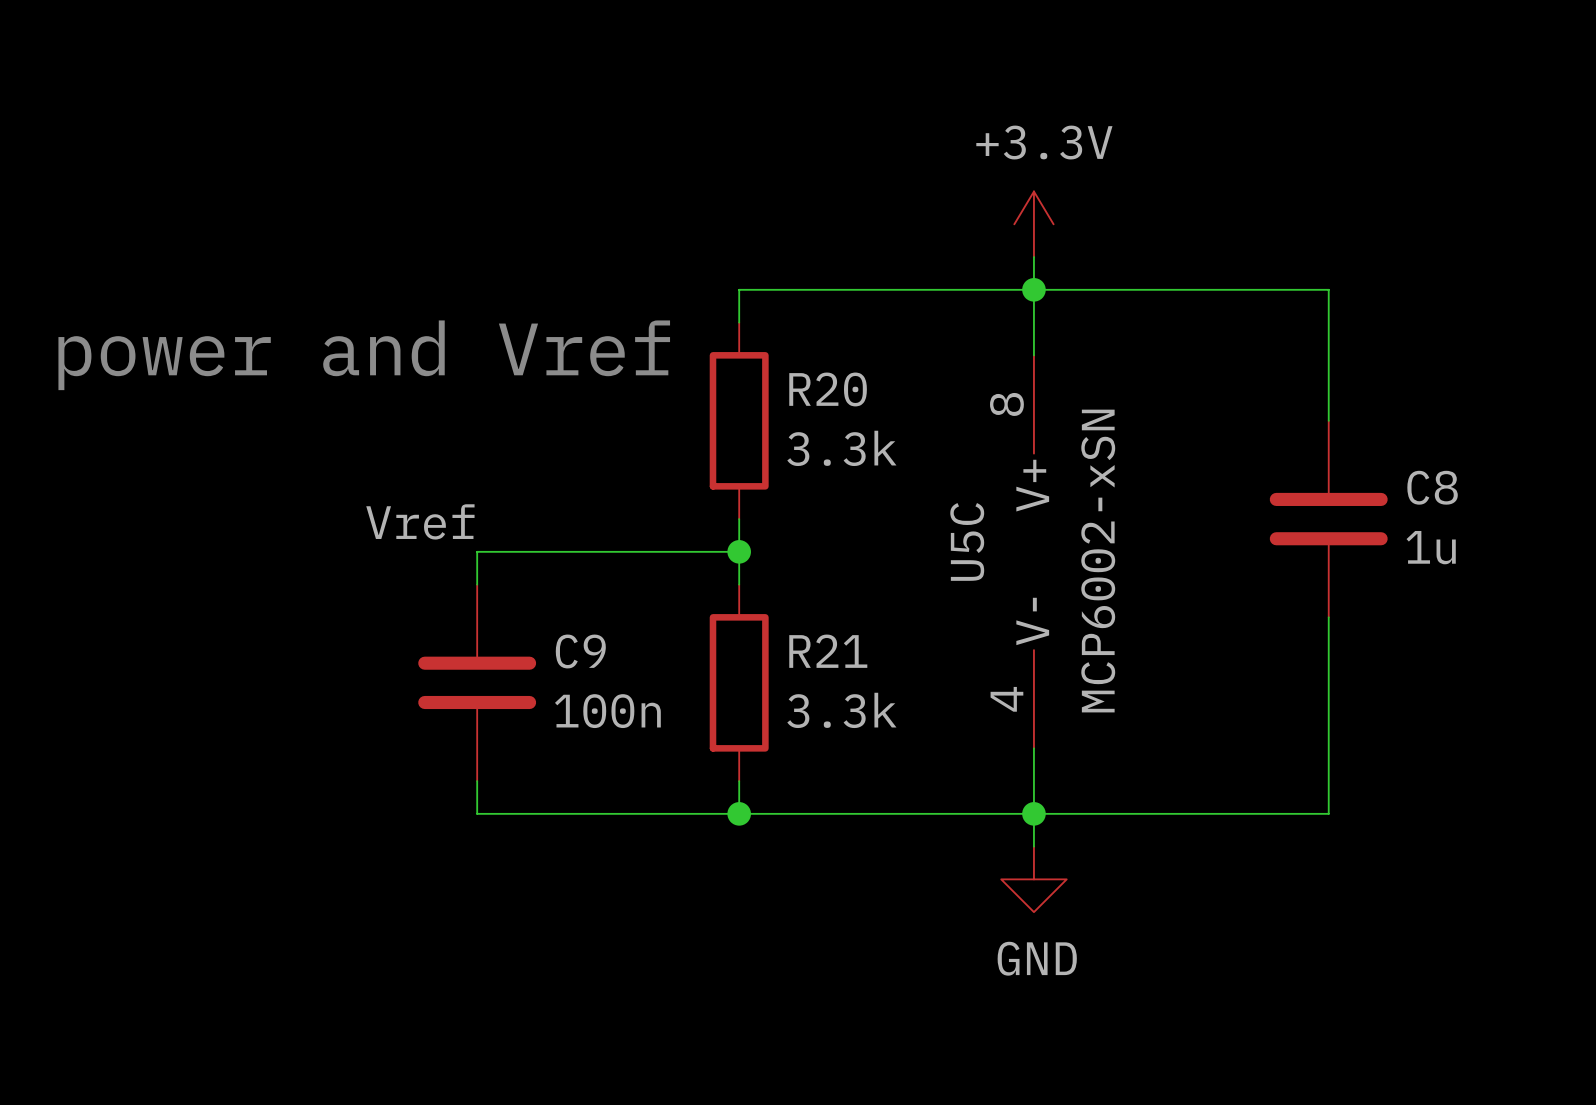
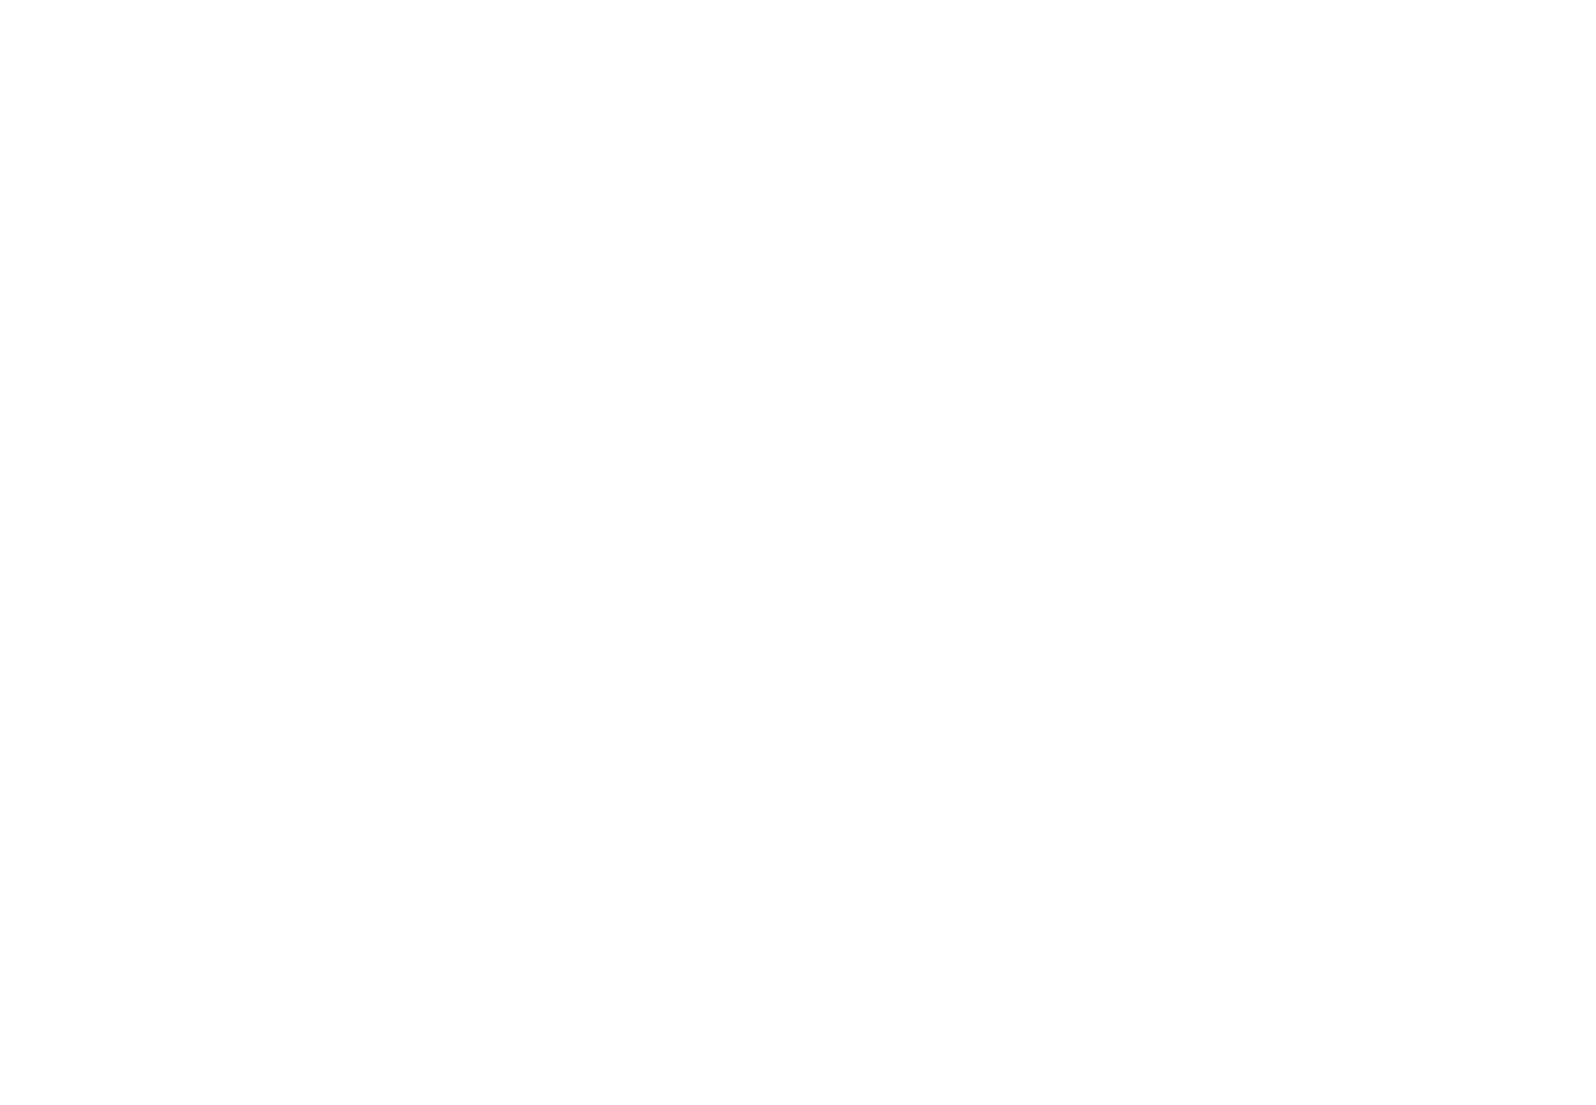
power symbol: +3.3V (1033, 224) -> none
wire: (1033, 257) (1033, 355) -> none
junction: (1033, 289) -> none
wire: (739, 322) (739, 289) (1328, 289) (1328, 420) -> none
text: power and Vref (364, 355) -> none
R20: 3.3k (739, 420) -> none
wire: (739, 519) (739, 584) -> none
C8: 1u (1328, 519) -> none
label: Vref (420, 521) -> none
wire: (739, 551) (477, 551) (477, 584) -> none
junction: (739, 551) -> none
U5C: MCP6002-xSN (1033, 551) -> none
wire: (1328, 617) (1328, 813) (477, 813) (477, 781) -> none
C9: 100n (477, 682) -> none
R21: 3.3k (739, 682) -> none
wire: (1033, 748) (1033, 846) -> none
wire: (739, 781) (739, 813) -> none
junction: (739, 813) -> none
junction: (1033, 813) -> none
power symbol: GND (1033, 879) -> none

